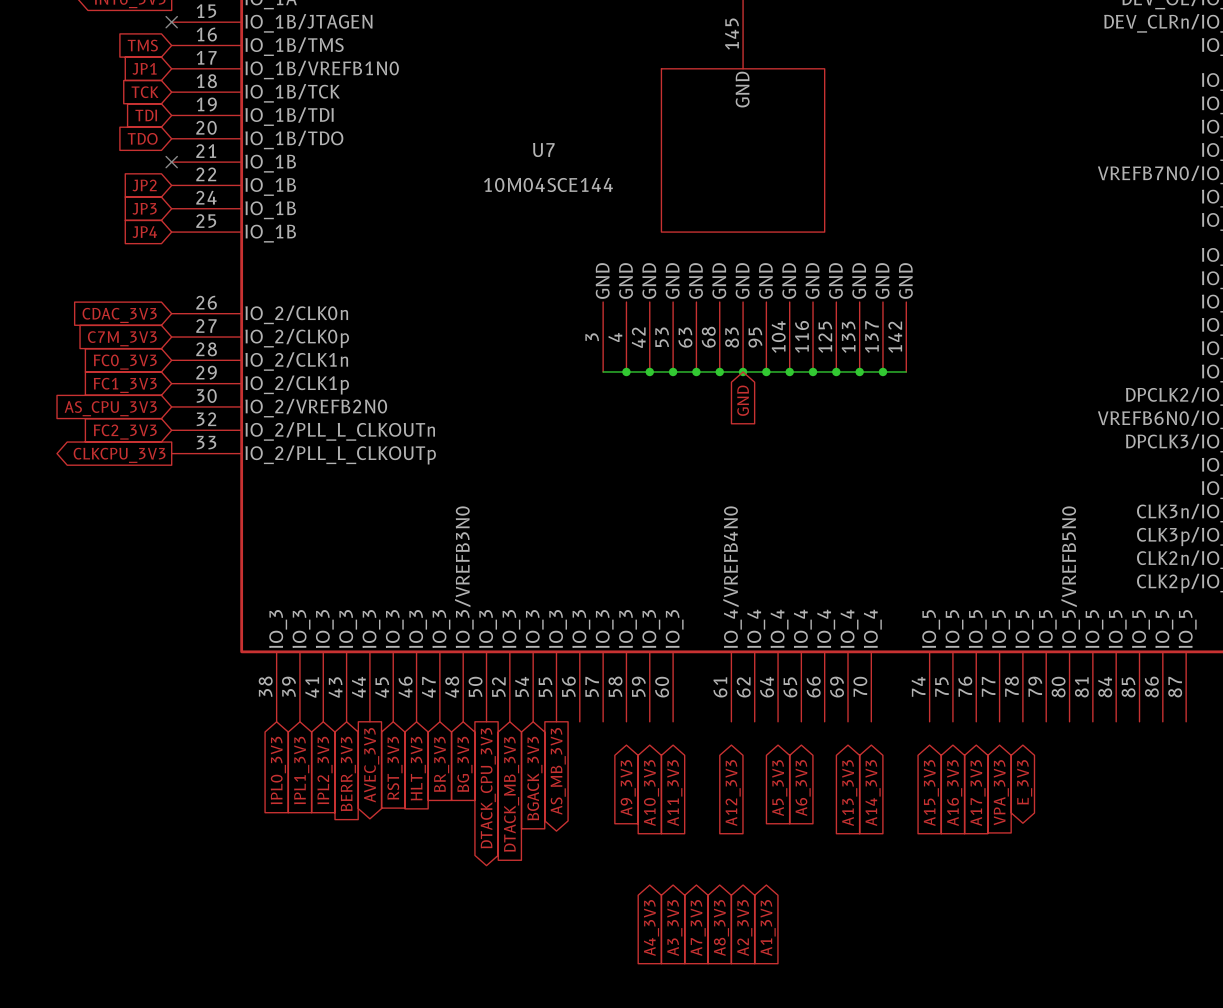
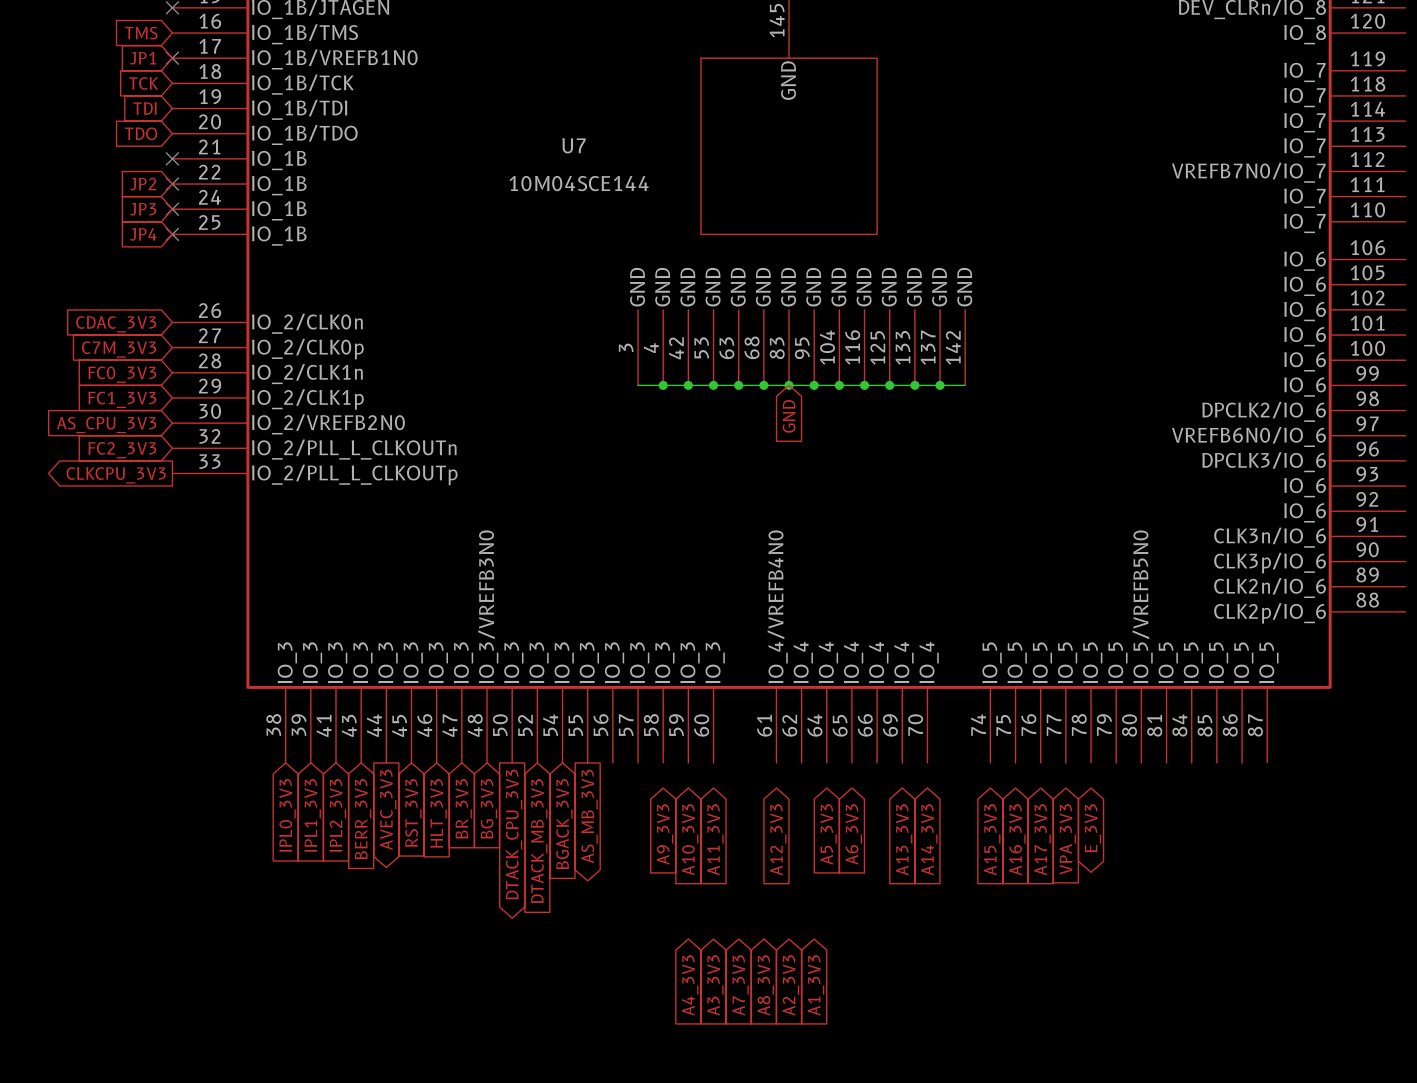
no-connect mark: none -> (172, 58)
no-connect mark: none -> (172, 184)
no-connect mark: none -> (172, 209)
no-connect mark: none -> (172, 234)

